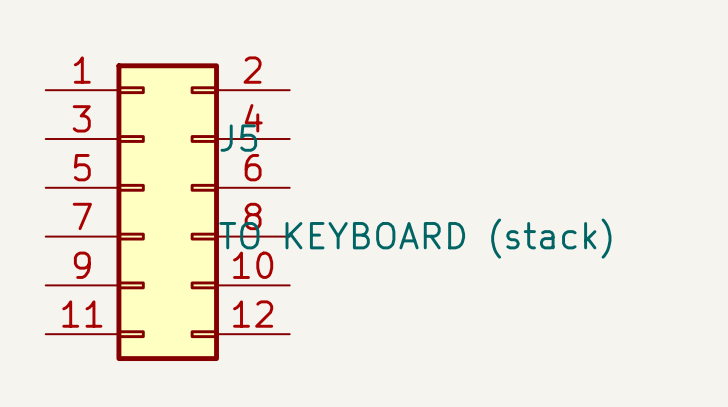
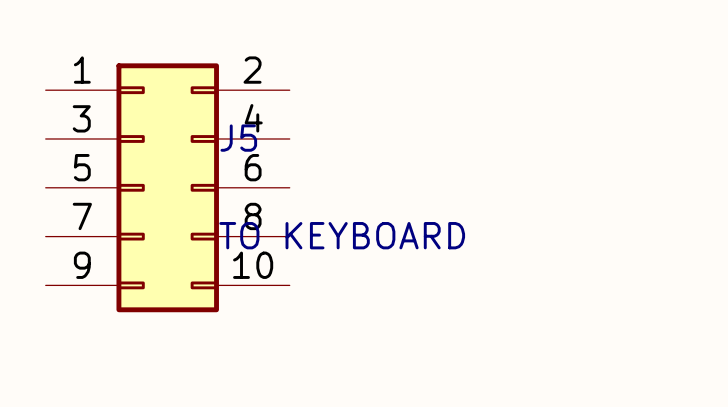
J5 symbol: [45, 63, 290, 362] -> [45, 63, 290, 313]
J5 value: TO KEYBOARD (stack) (415, 238) -> TO KEYBOARD (342, 235)

